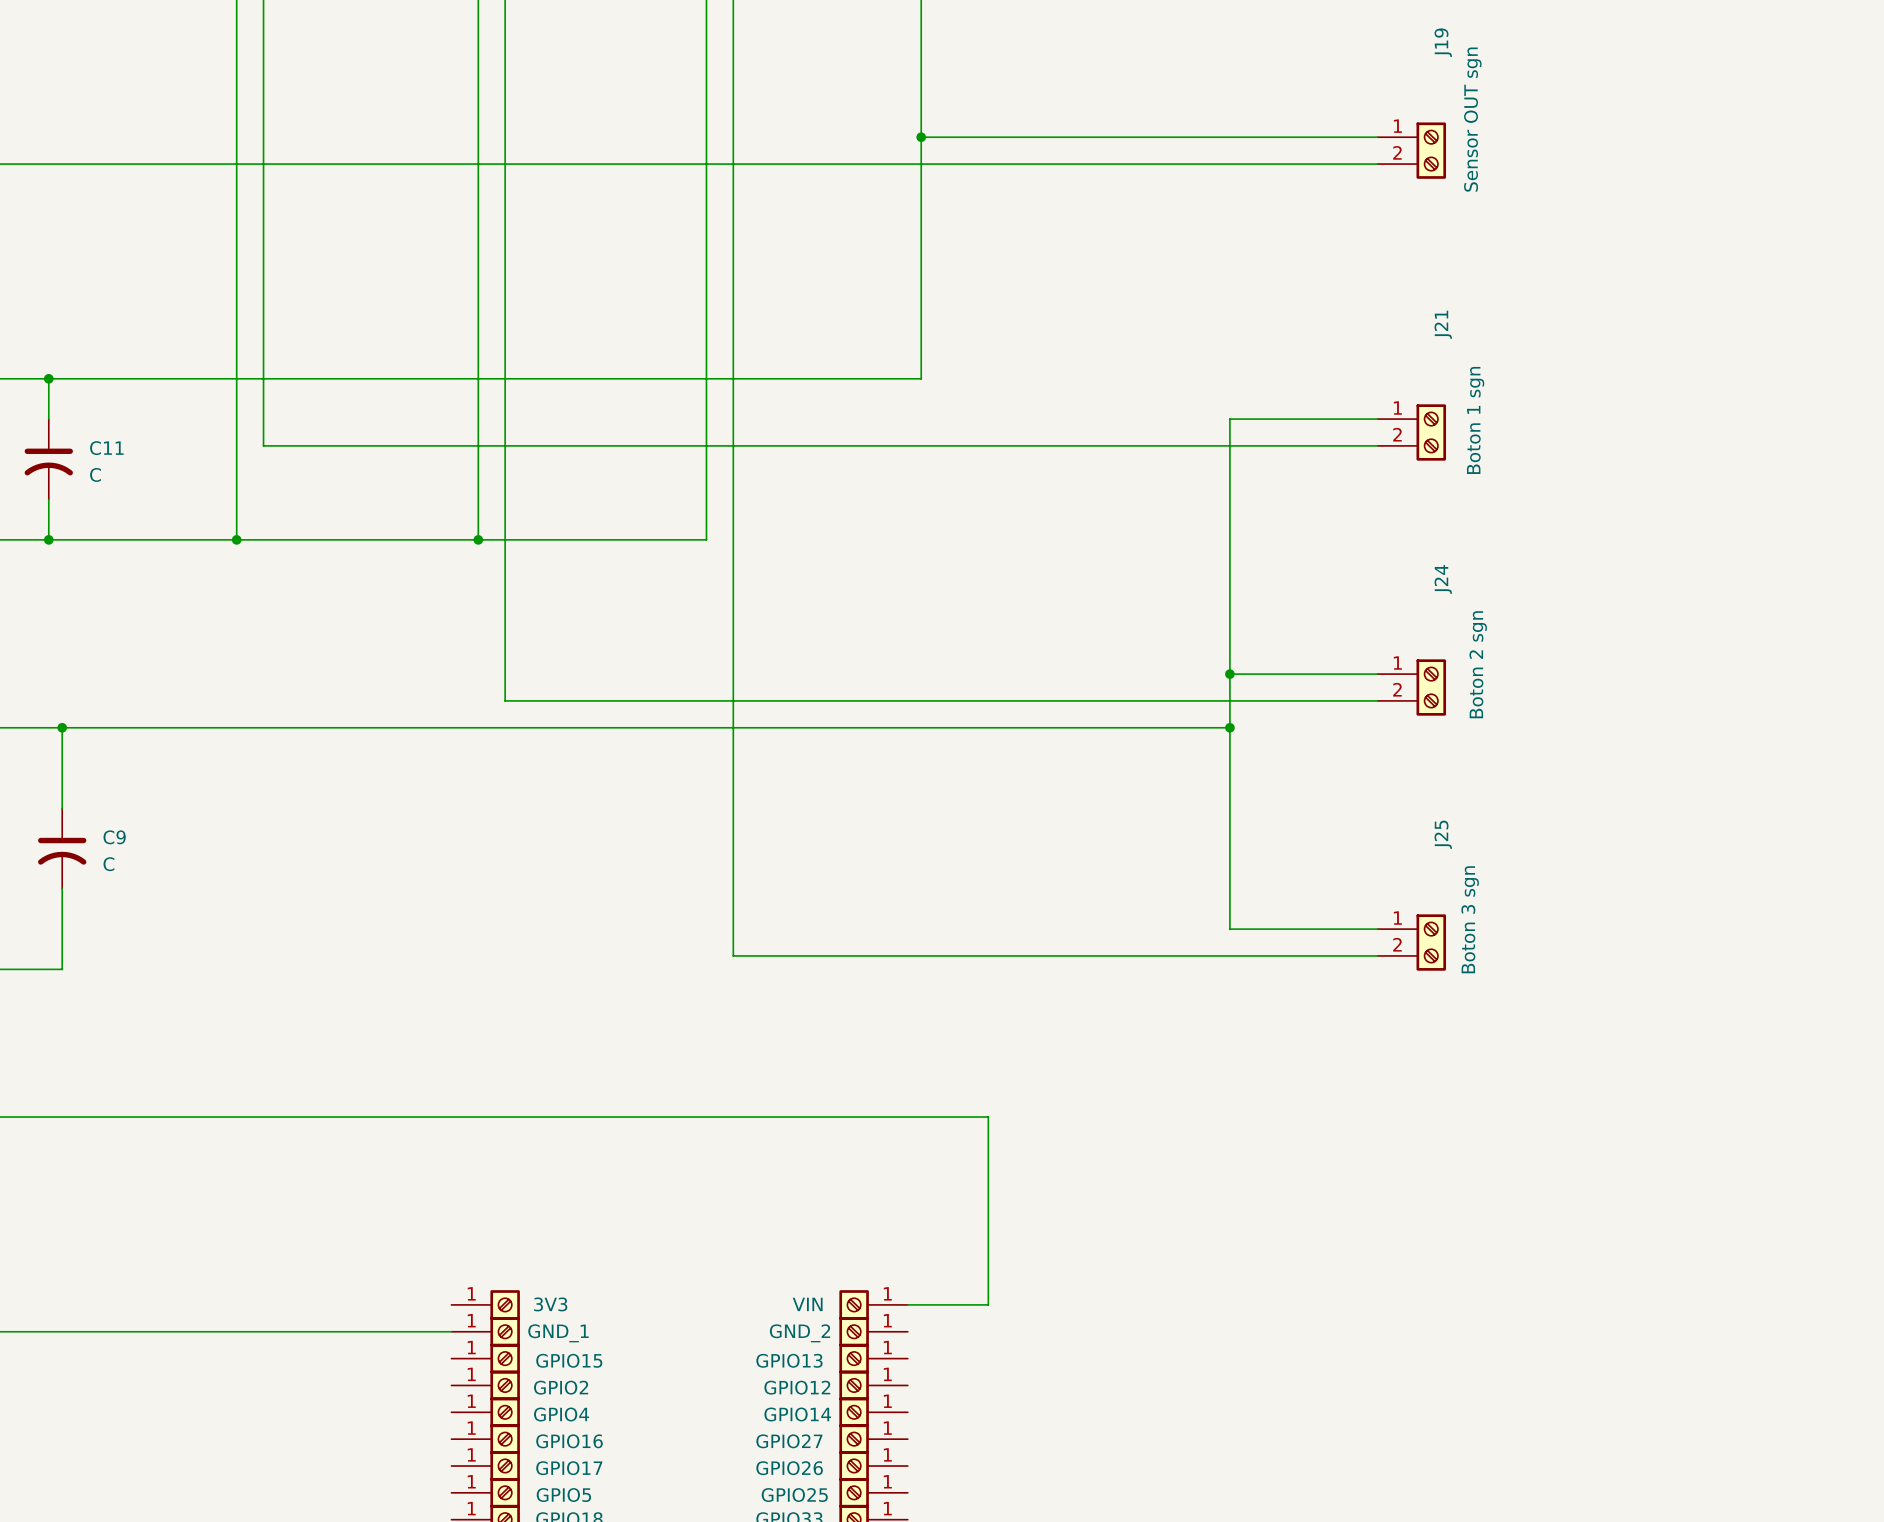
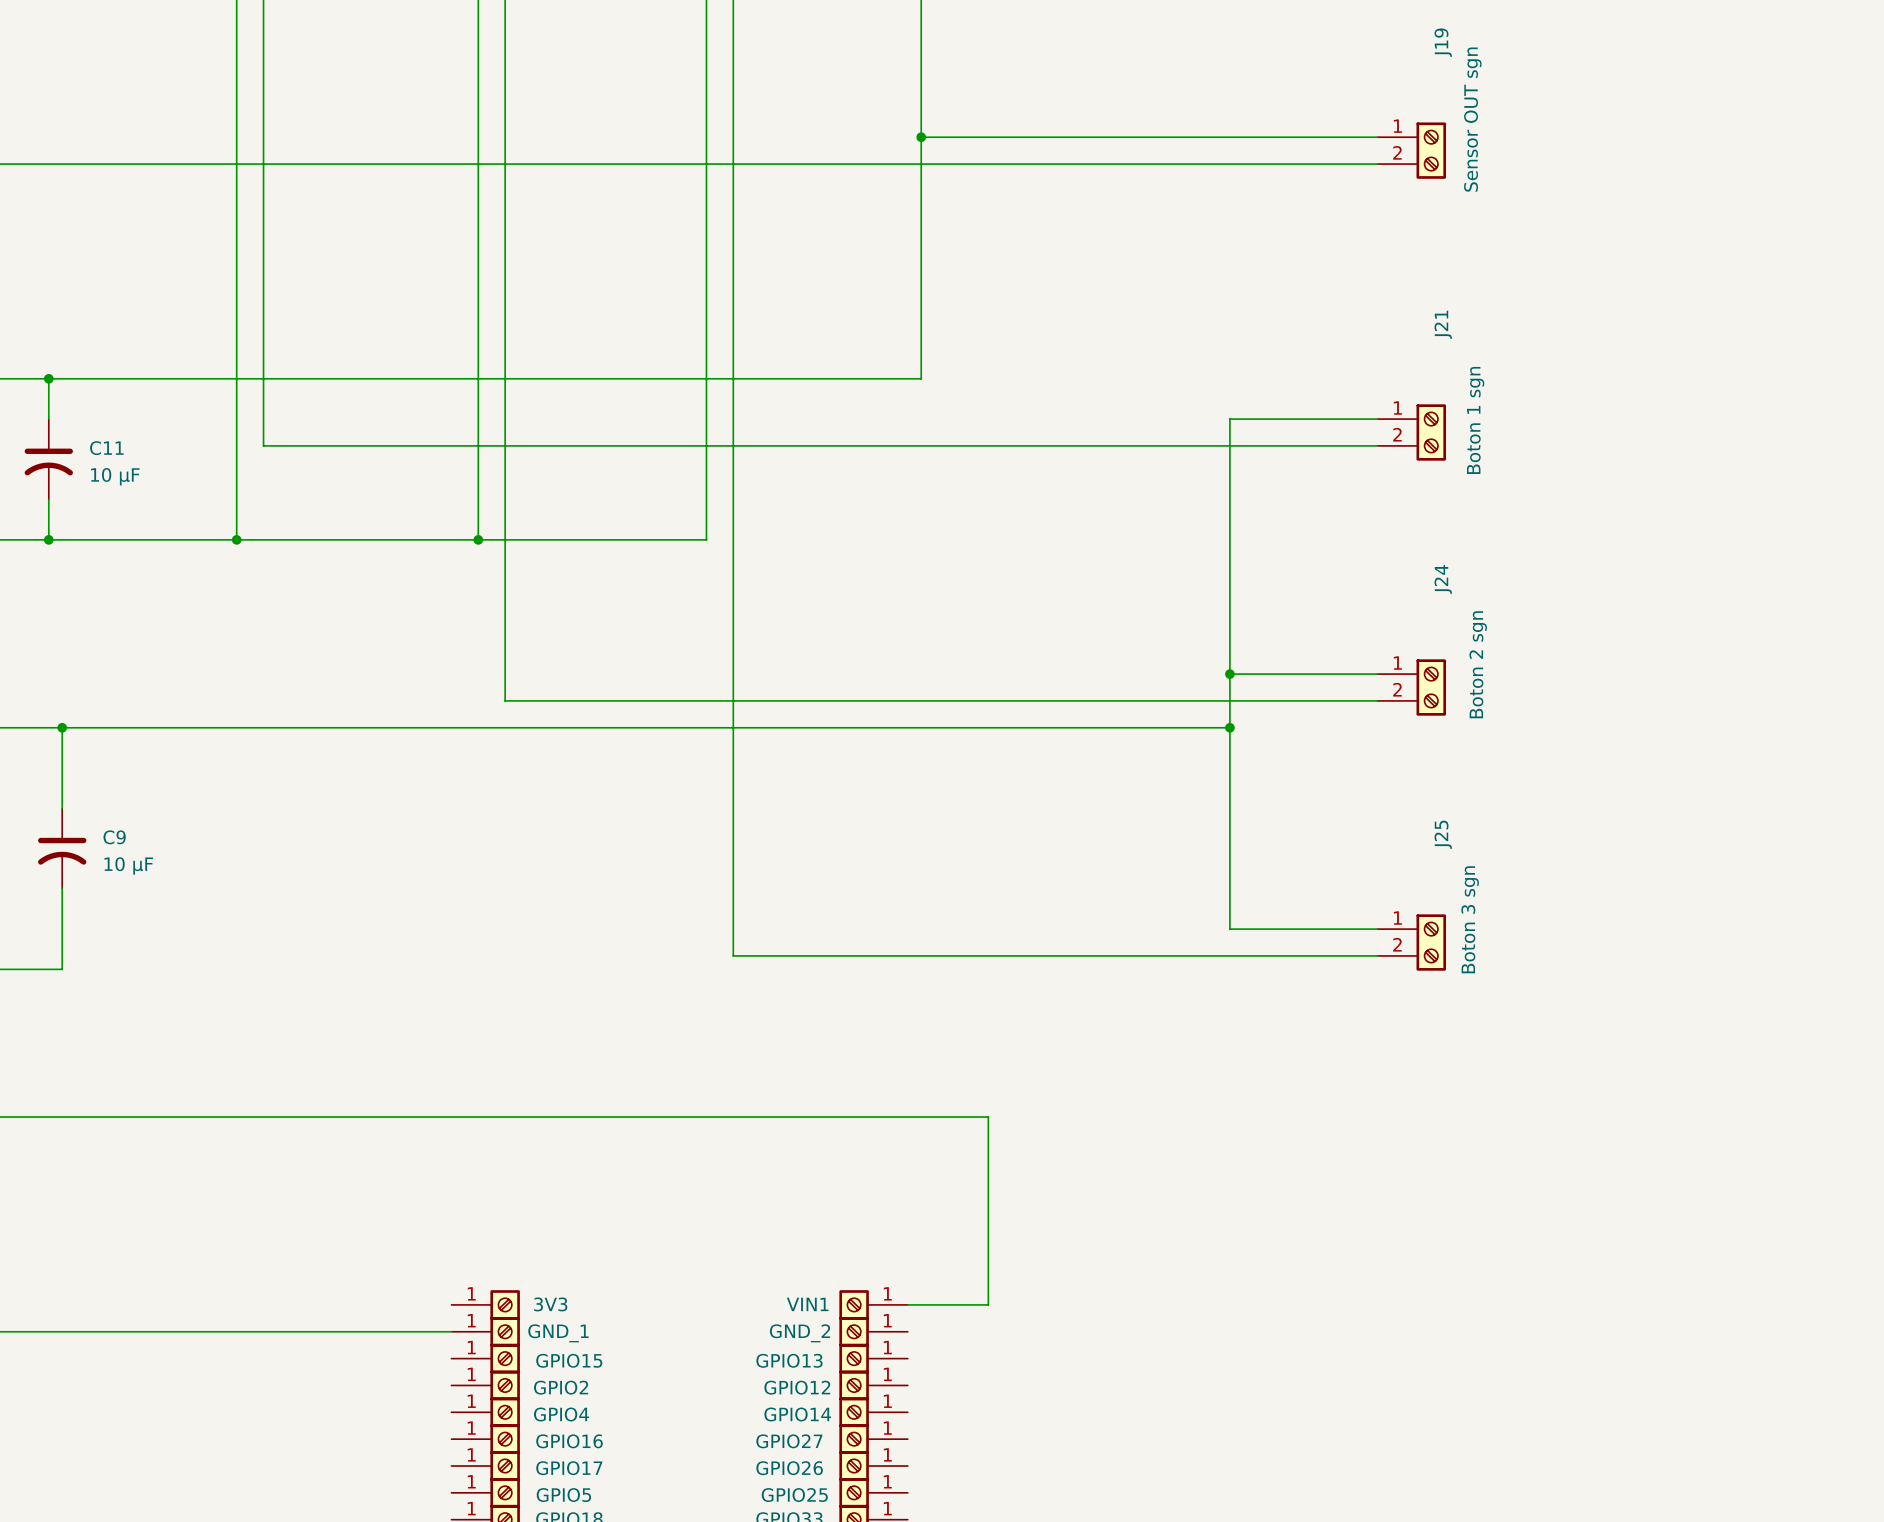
C11 value: C (95, 474) -> 10 μF (115, 476)
C9 value: C (108, 864) -> 10 μF (128, 865)
VIN name: VIN (807, 1304) -> VIN1 (807, 1304)

